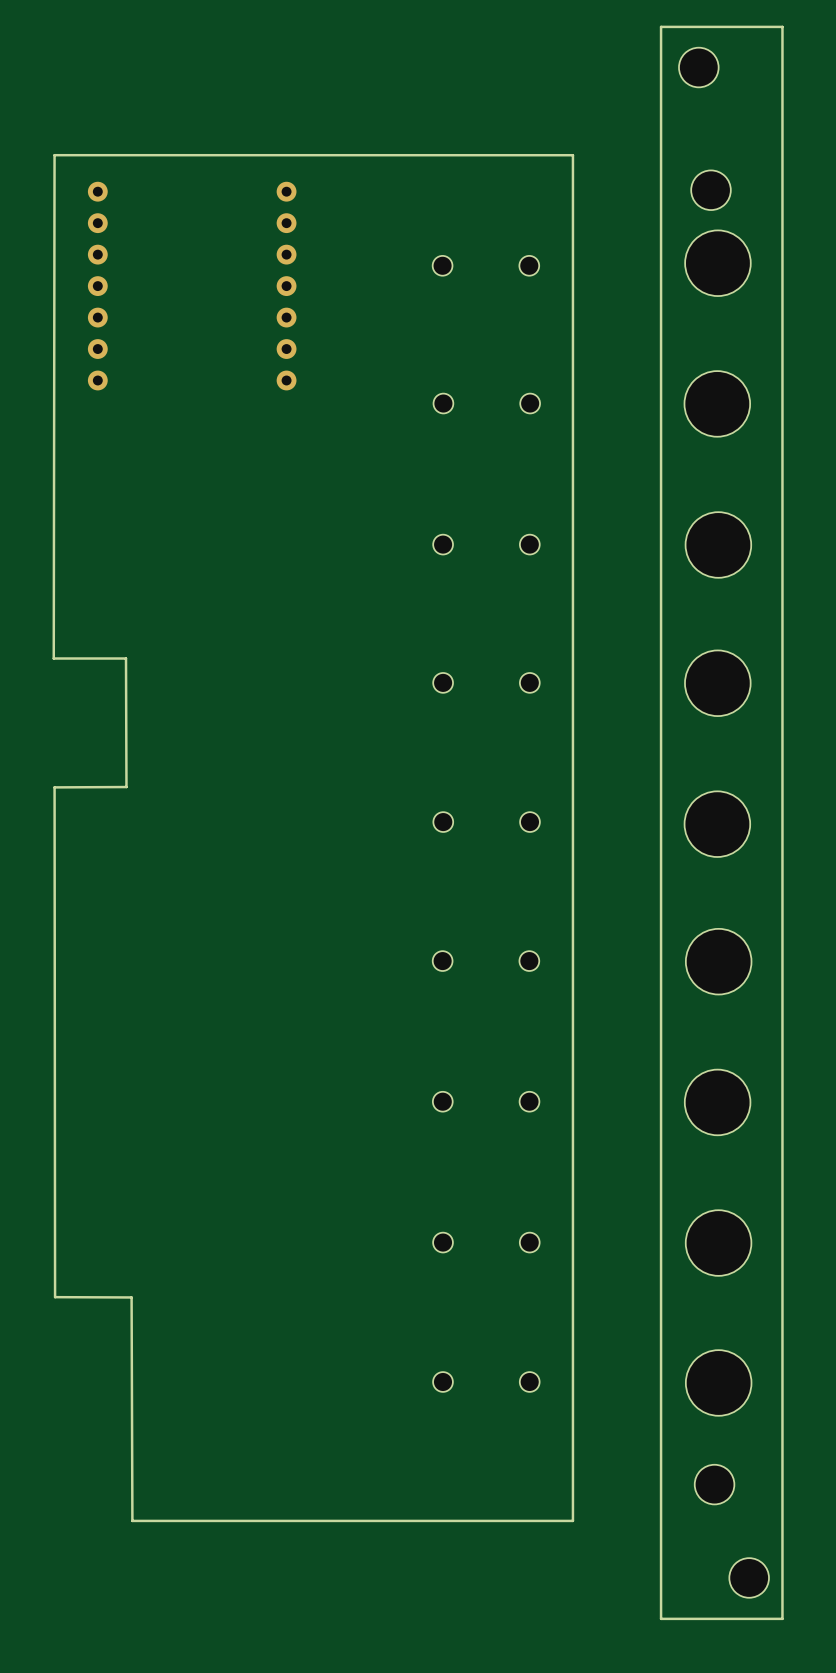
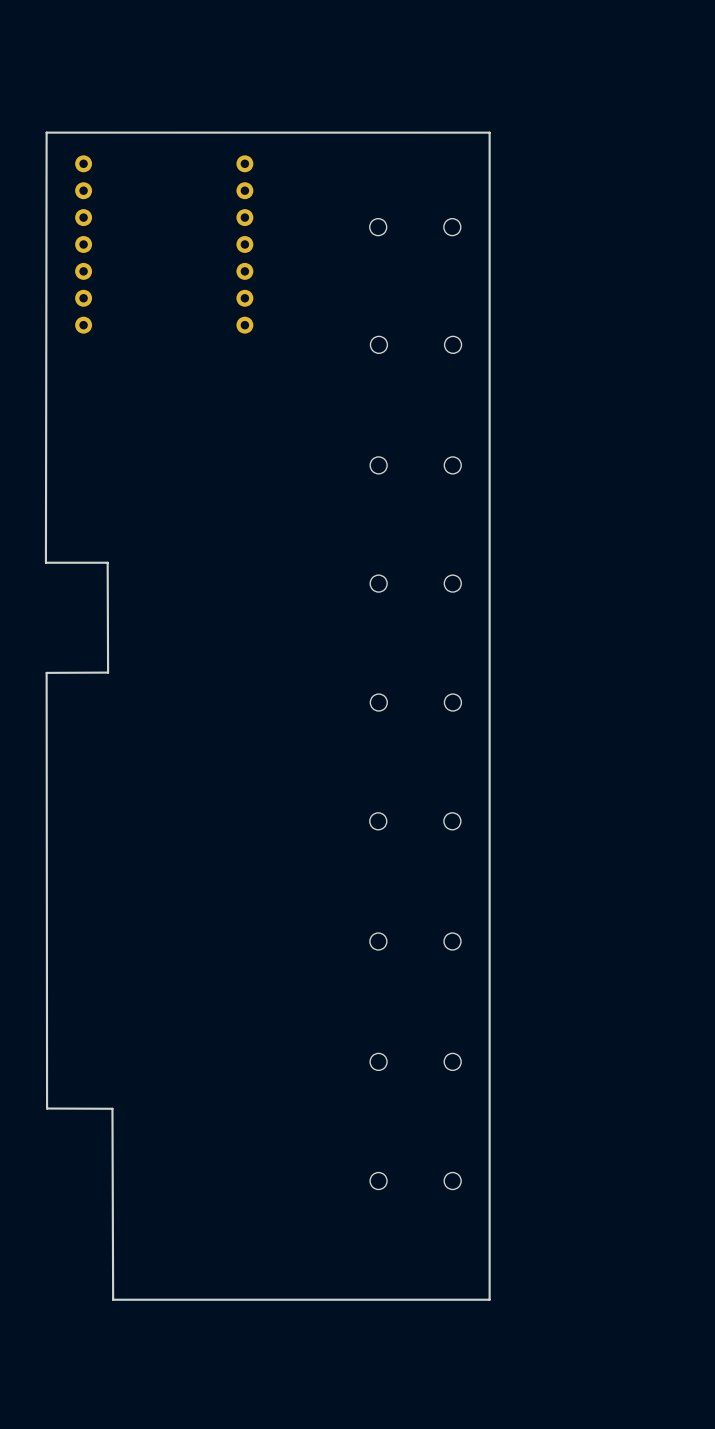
board edge: (782, 26) (661, 26) (661, 1618) (782, 1618) (782, 26) -> none
part: (698, 67) -> none
part: (711, 190) -> none
part: (717, 263) -> none
part: (717, 403) -> none
part: (718, 544) -> none
part: (717, 683) -> none
part: (717, 824) -> none
part: (718, 961) -> none
part: (717, 1102) -> none
part: (718, 1243) -> none
part: (718, 1382) -> none
part: (714, 1484) -> none
part: (749, 1577) -> none

